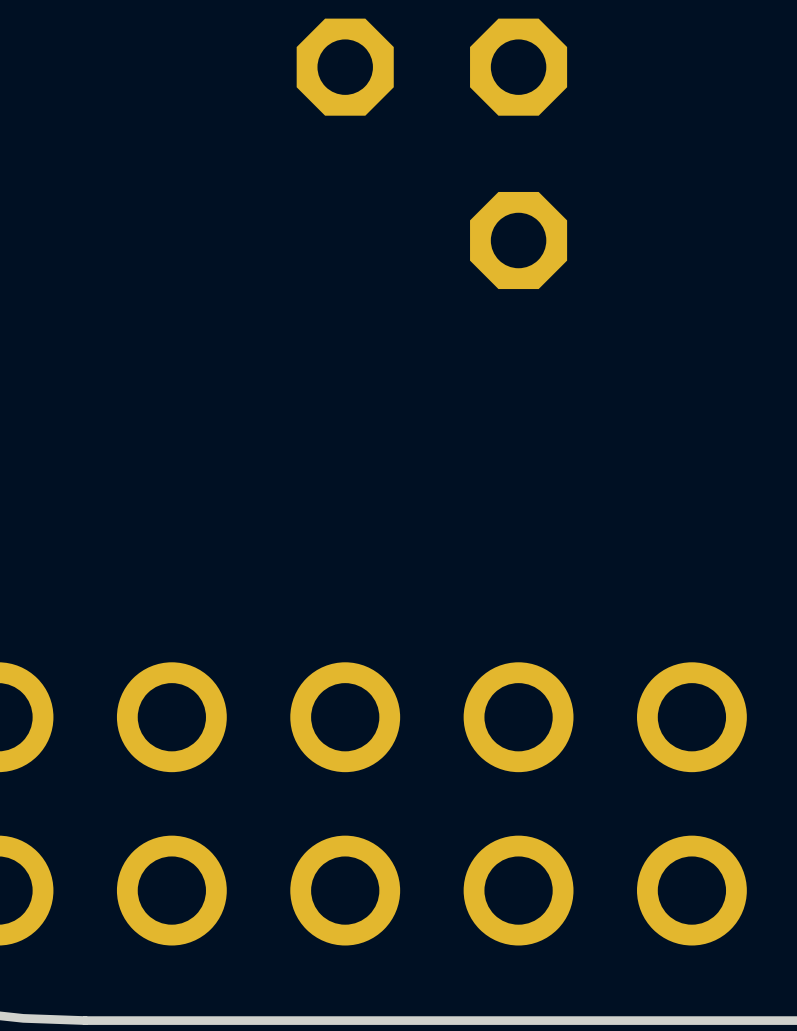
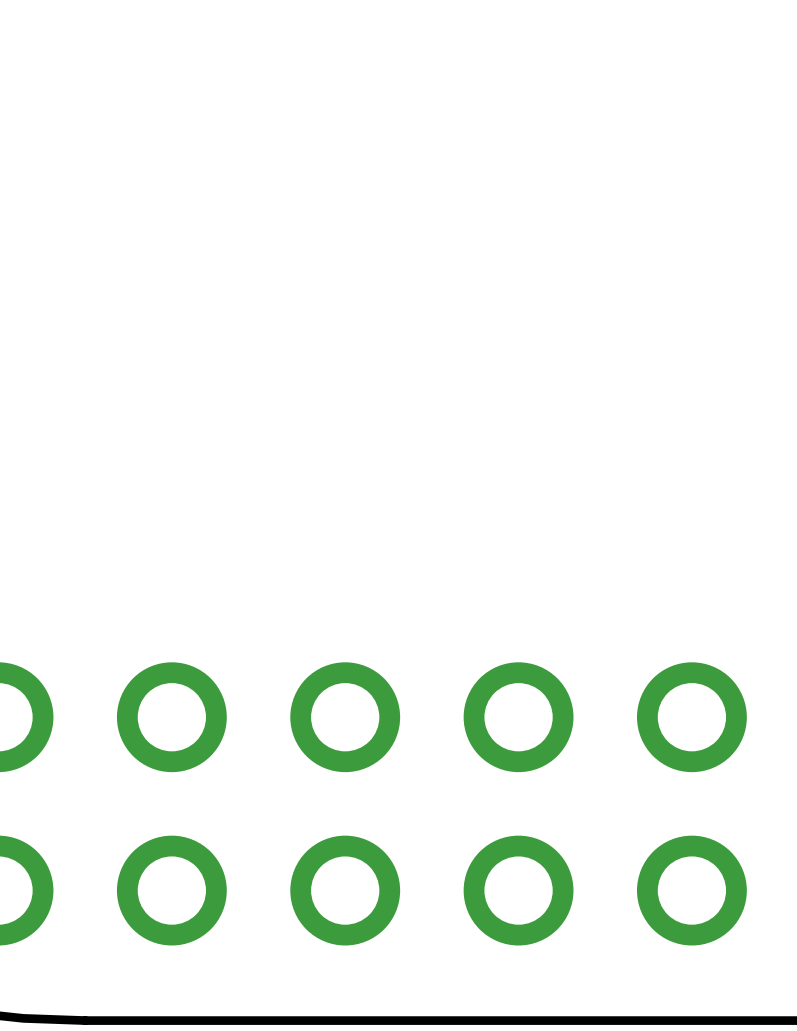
part: (431, 153) -> none

